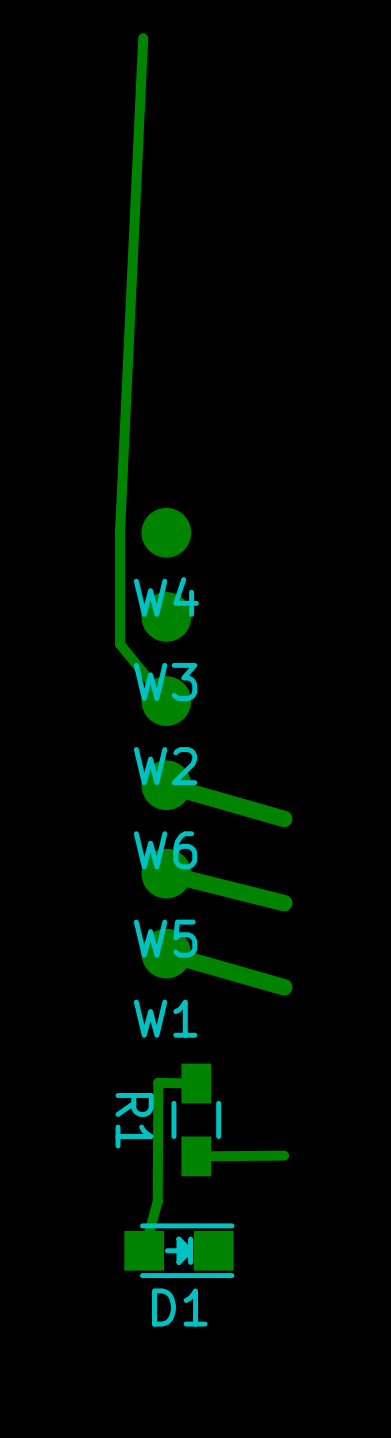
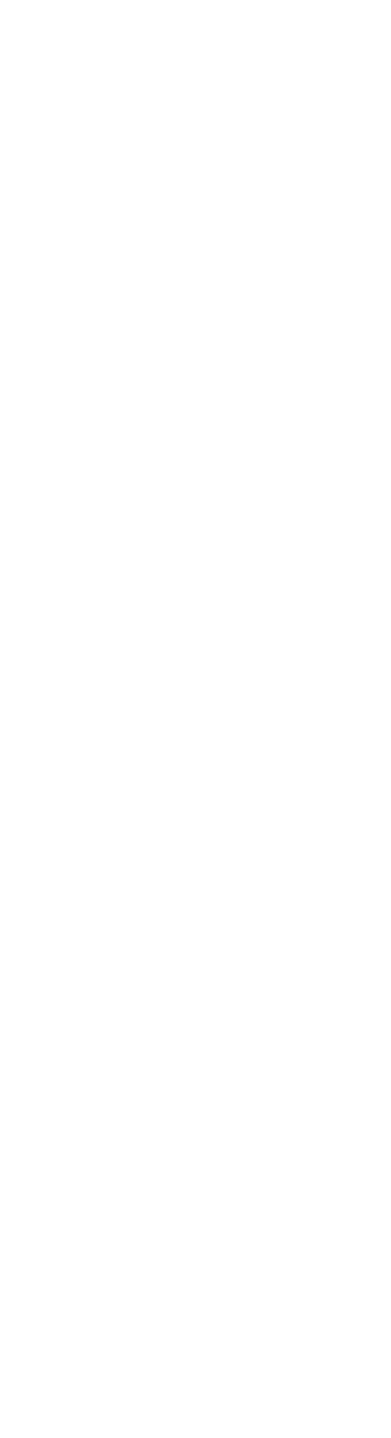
bottom track: (143, 38) (120, 530) (120, 644) (166, 701) -> none
W4: (166, 532) -> none
W3: (166, 616) -> none
W2: (166, 701) -> none
bottom track: (166, 785) (284, 818) -> none
W6: (166, 785) -> none
bottom track: (166, 873) (284, 903) -> none
W5: (166, 873) -> none
bottom track: (166, 953) (284, 987) -> none
W1: (166, 953) -> none
bottom track: (196, 1083) (158, 1082) (157, 1201) (144, 1250) -> none
R1: (196, 1119) -> none
bottom track: (284, 1155) (196, 1156) -> none
D1: (179, 1250) -> none

